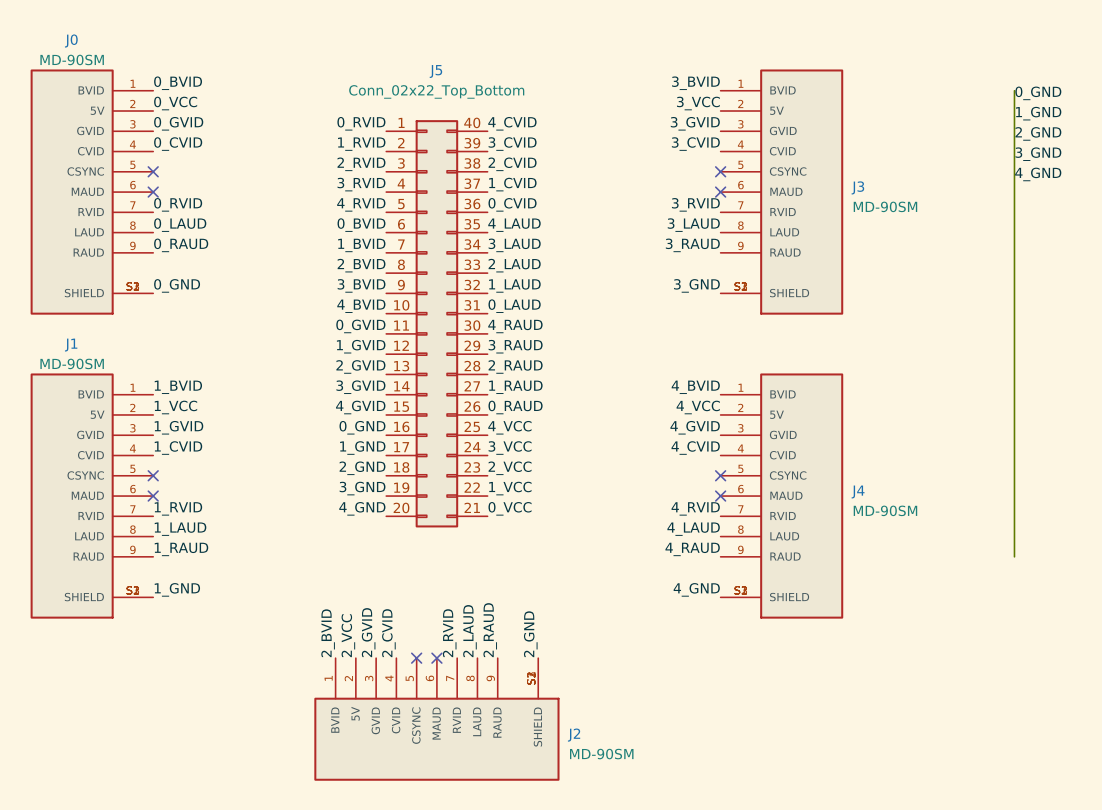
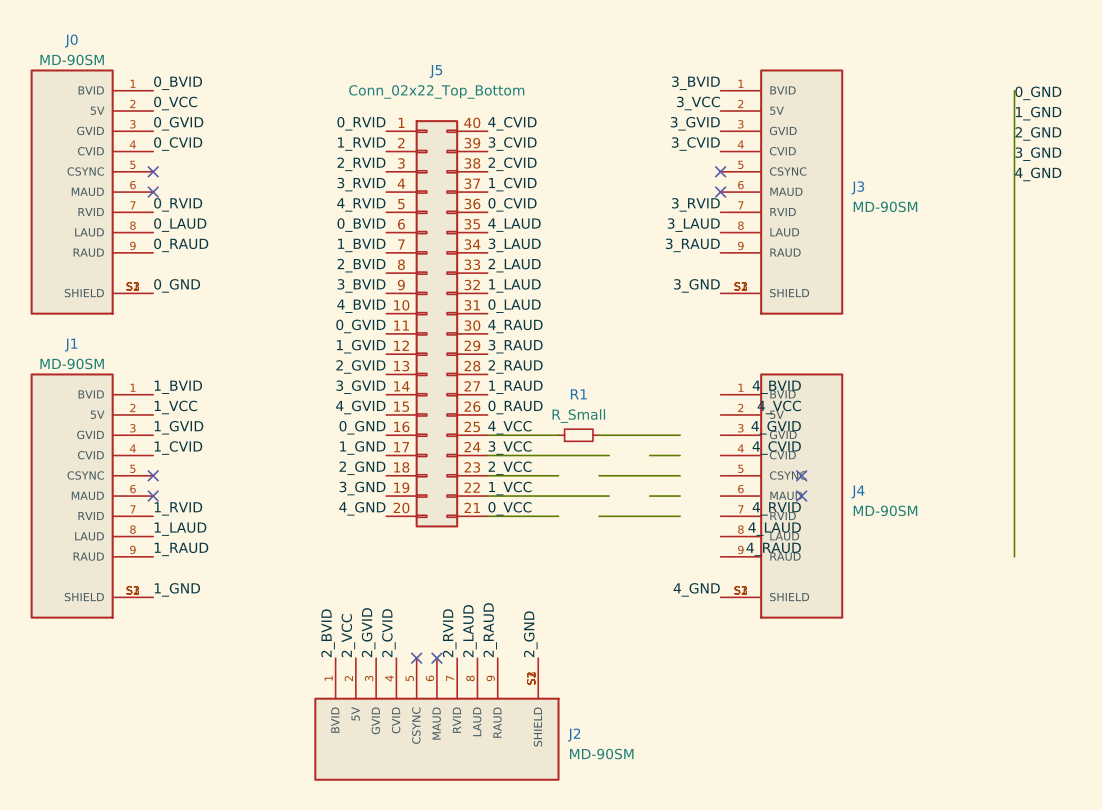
label position: 4_BVID (695, 387) -> 4_BVID (776, 387)
label position: 4_VCC (698, 407) -> 4_VCC (779, 407)
label position: 4_GVID (695, 427) -> 4_GVID (776, 427)
wire: none -> (487, 435) (558, 435)
R1: none -> R_Small (578, 435)
wire: none -> (599, 435) (680, 435)
label position: 4_CVID (695, 448) -> 4_CVID (776, 448)
wire: none -> (487, 455) (609, 455)
wire: none -> (649, 455) (680, 455)
wire: none -> (487, 475) (558, 475)
wire: none -> (599, 475) (680, 475)
no-connect mark: (720, 475) -> none
no-connect mark: none -> (801, 475)
wire: none -> (487, 496) (609, 496)
wire: none -> (649, 496) (680, 496)
no-connect mark: (720, 496) -> none
no-connect mark: none -> (801, 496)
label position: 4_RVID (695, 508) -> 4_RVID (776, 508)
wire: none -> (487, 516) (558, 516)
wire: none -> (599, 516) (680, 516)
label position: 4_LAUD (693, 529) -> 4_LAUD (774, 529)
label position: 4_RAUD (692, 549) -> 4_RAUD (773, 549)

